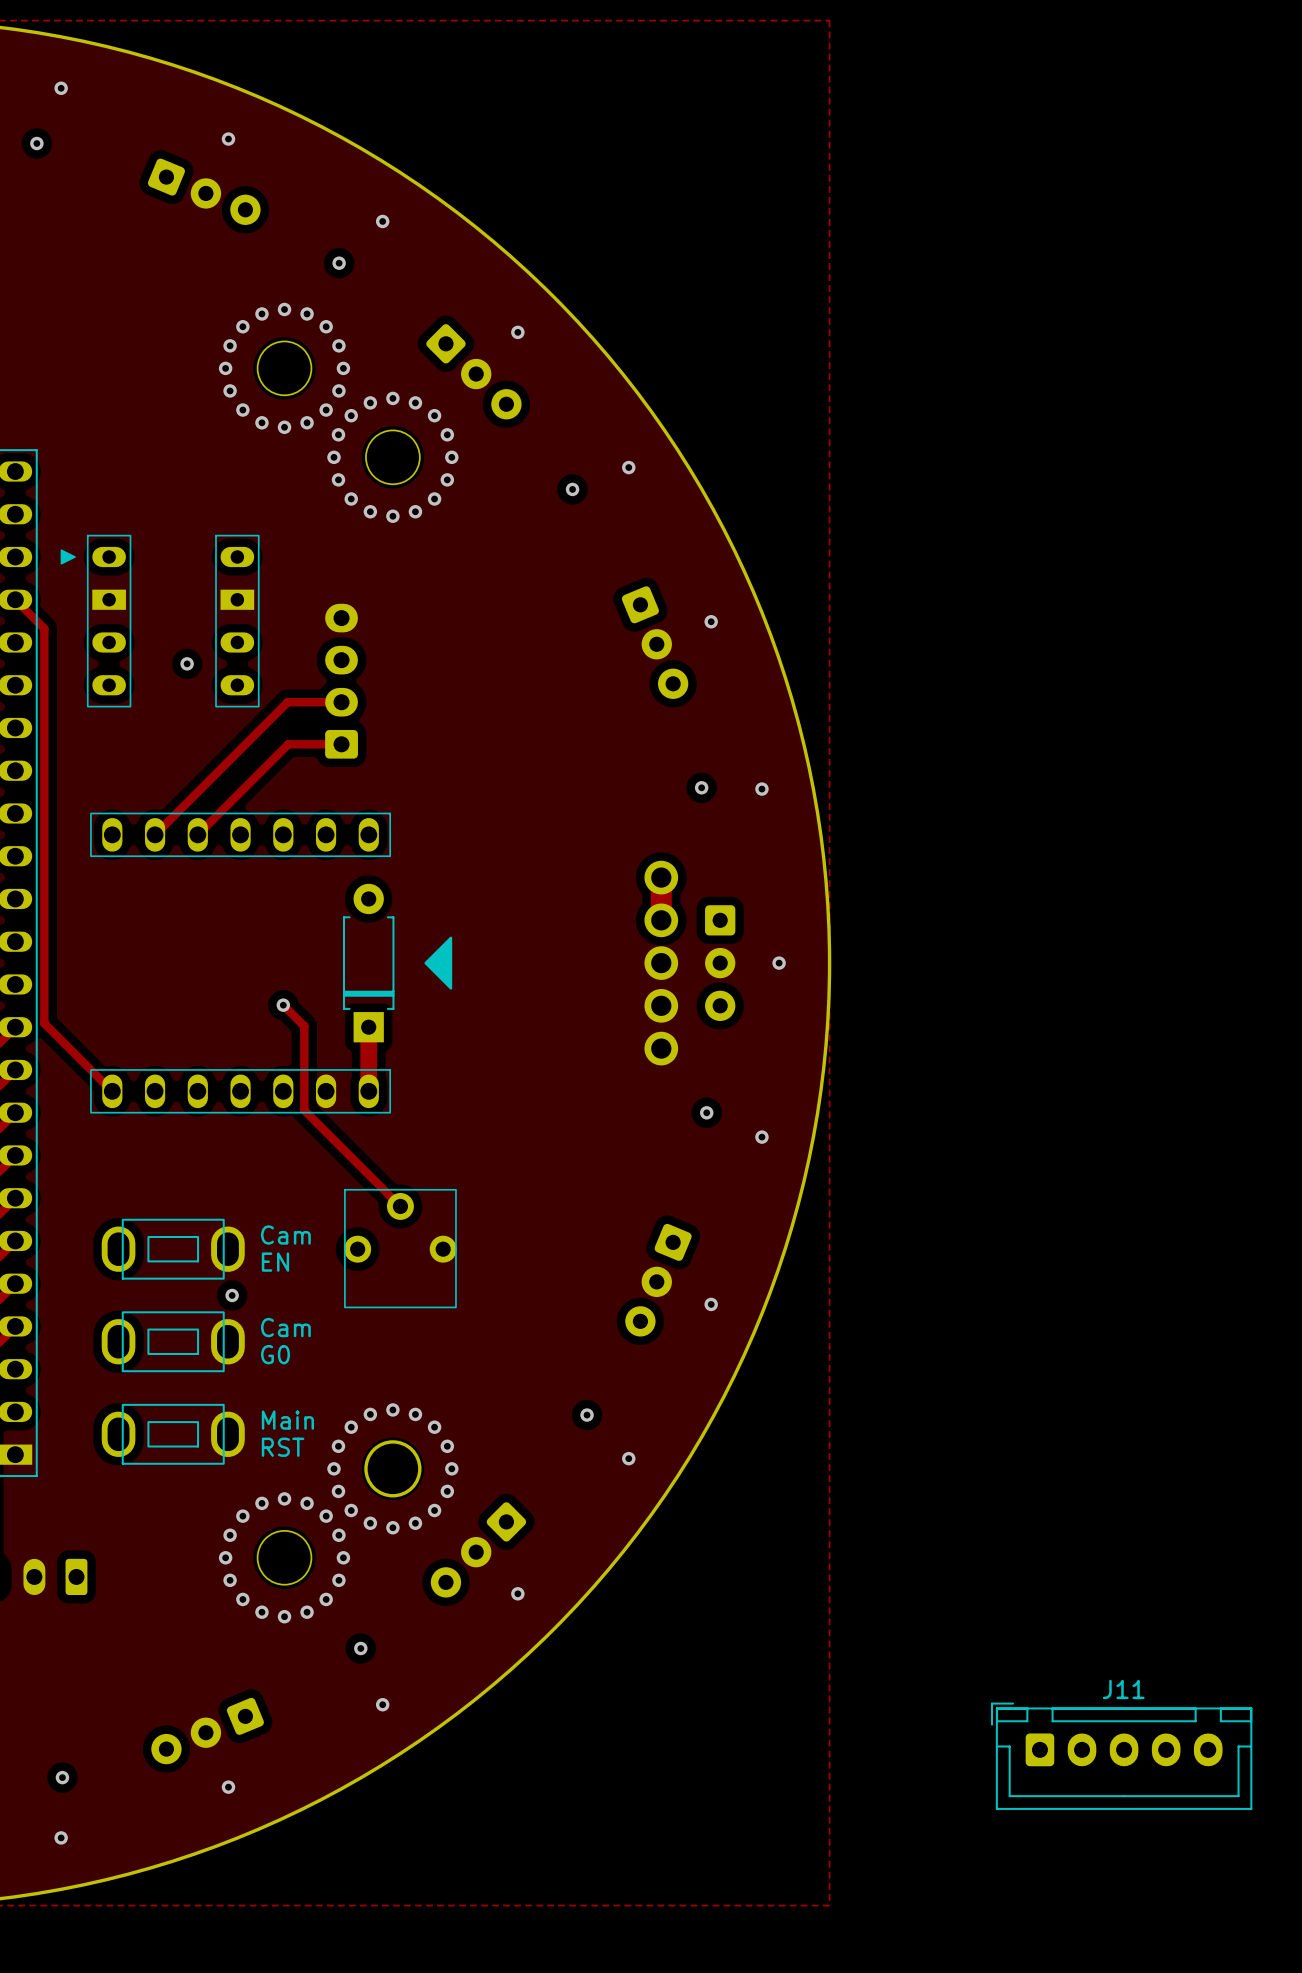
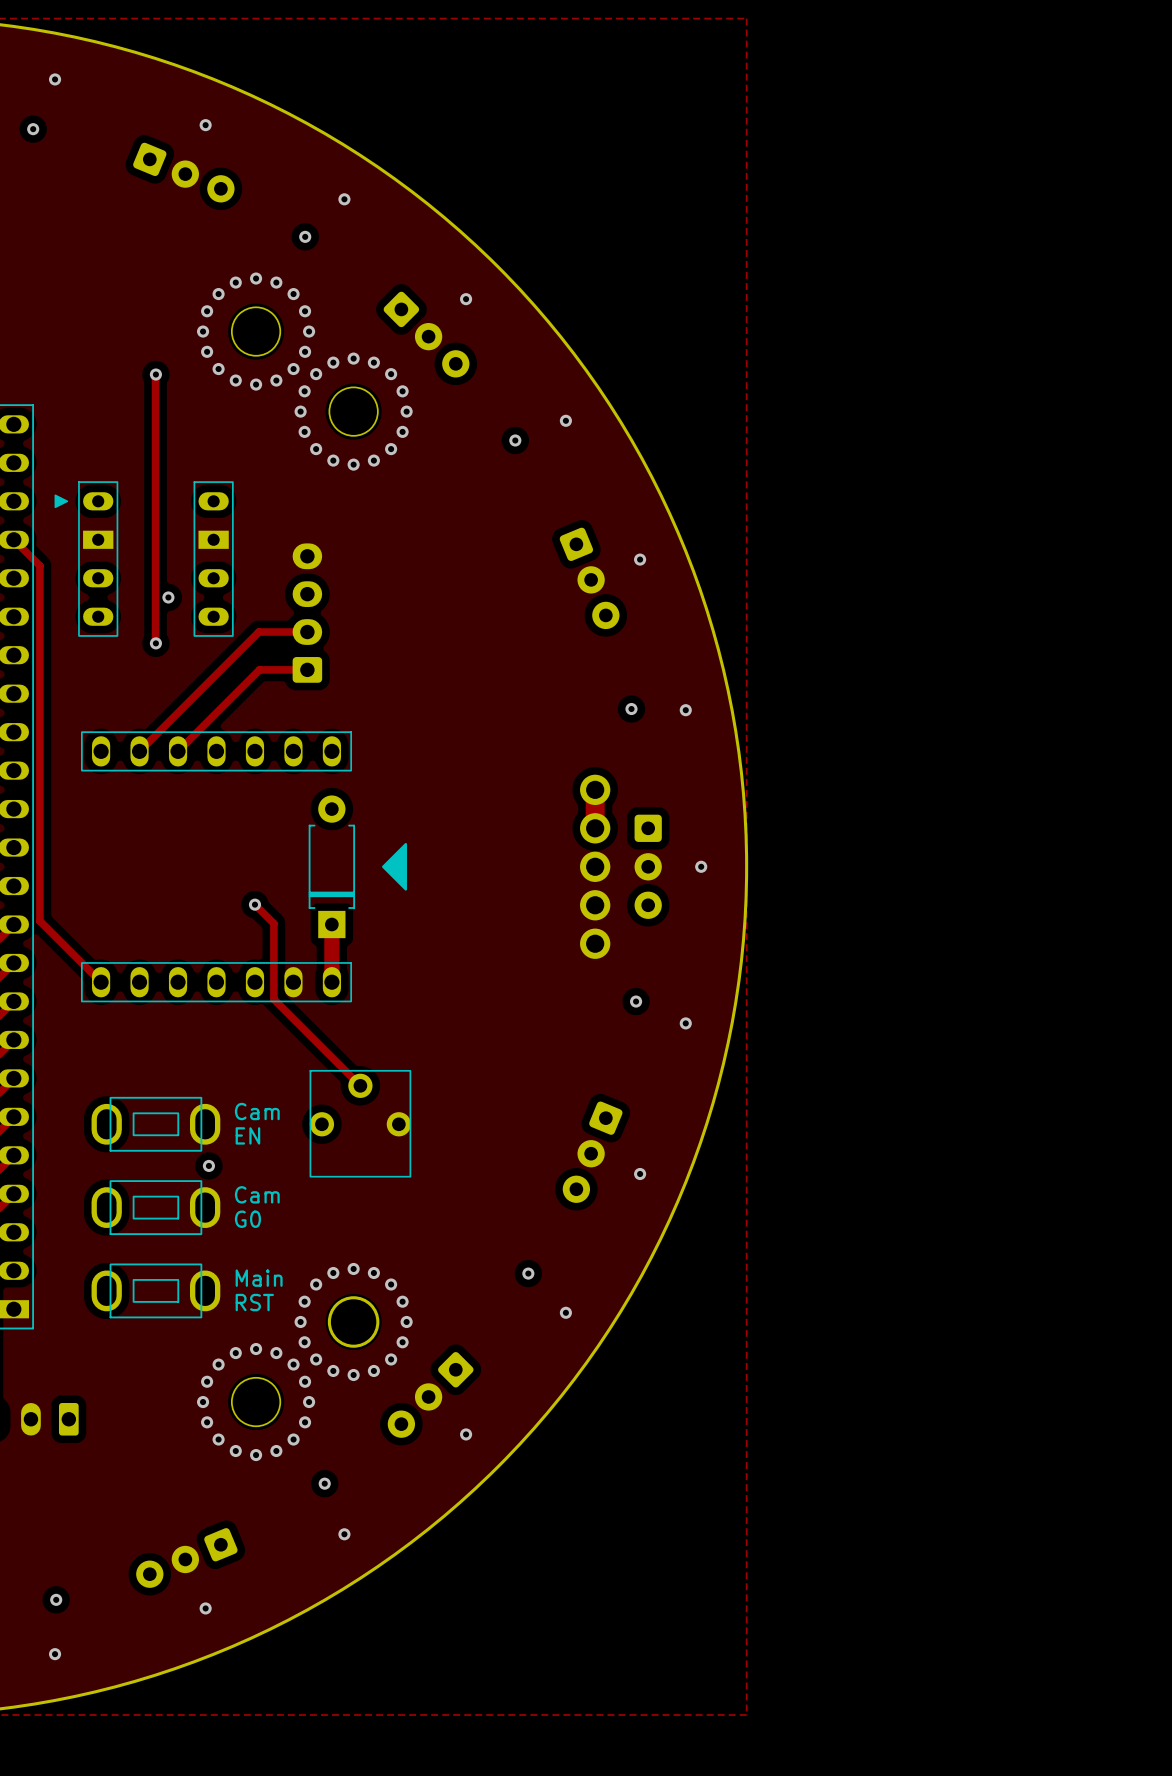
track: none -> (155, 374) (155, 643)
via: none -> (155, 374)
via: none -> (155, 643)
J11: (1121, 1756) -> none

